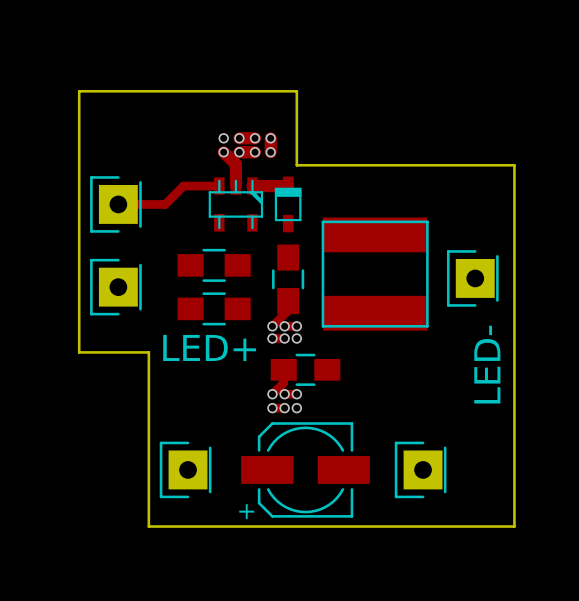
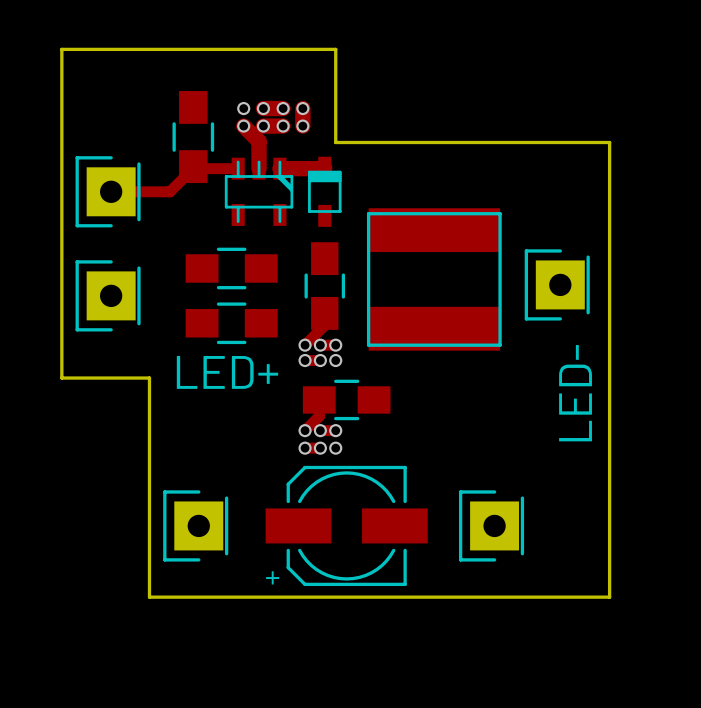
part: none -> (193, 137)

